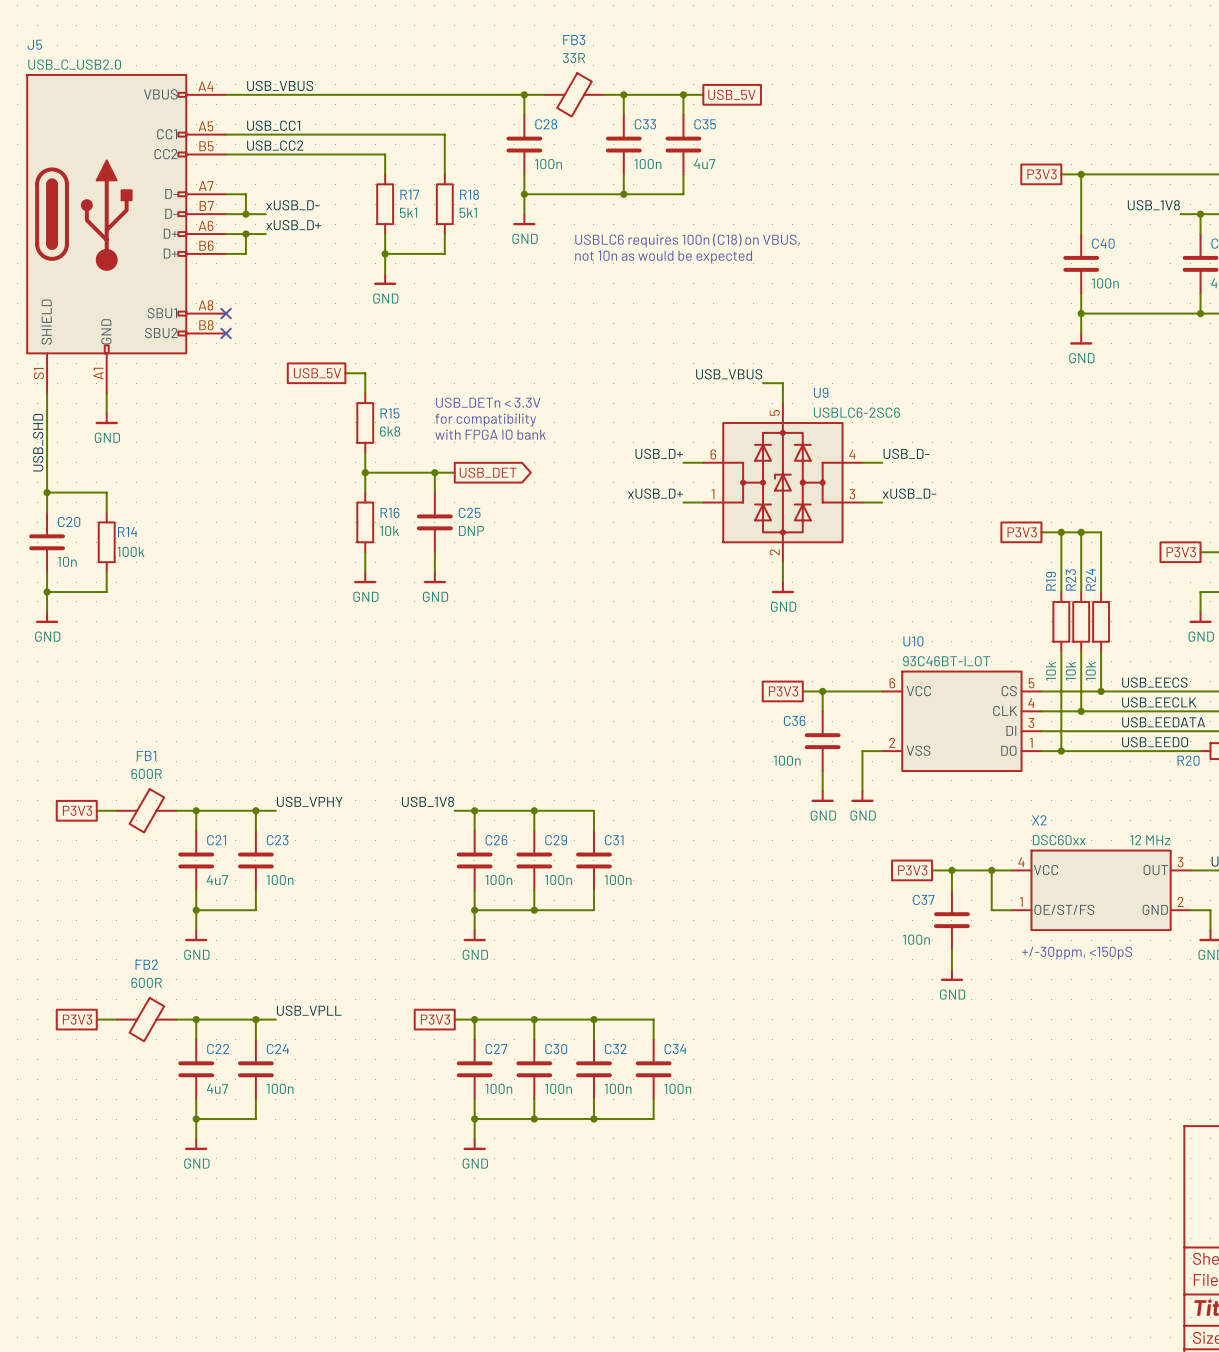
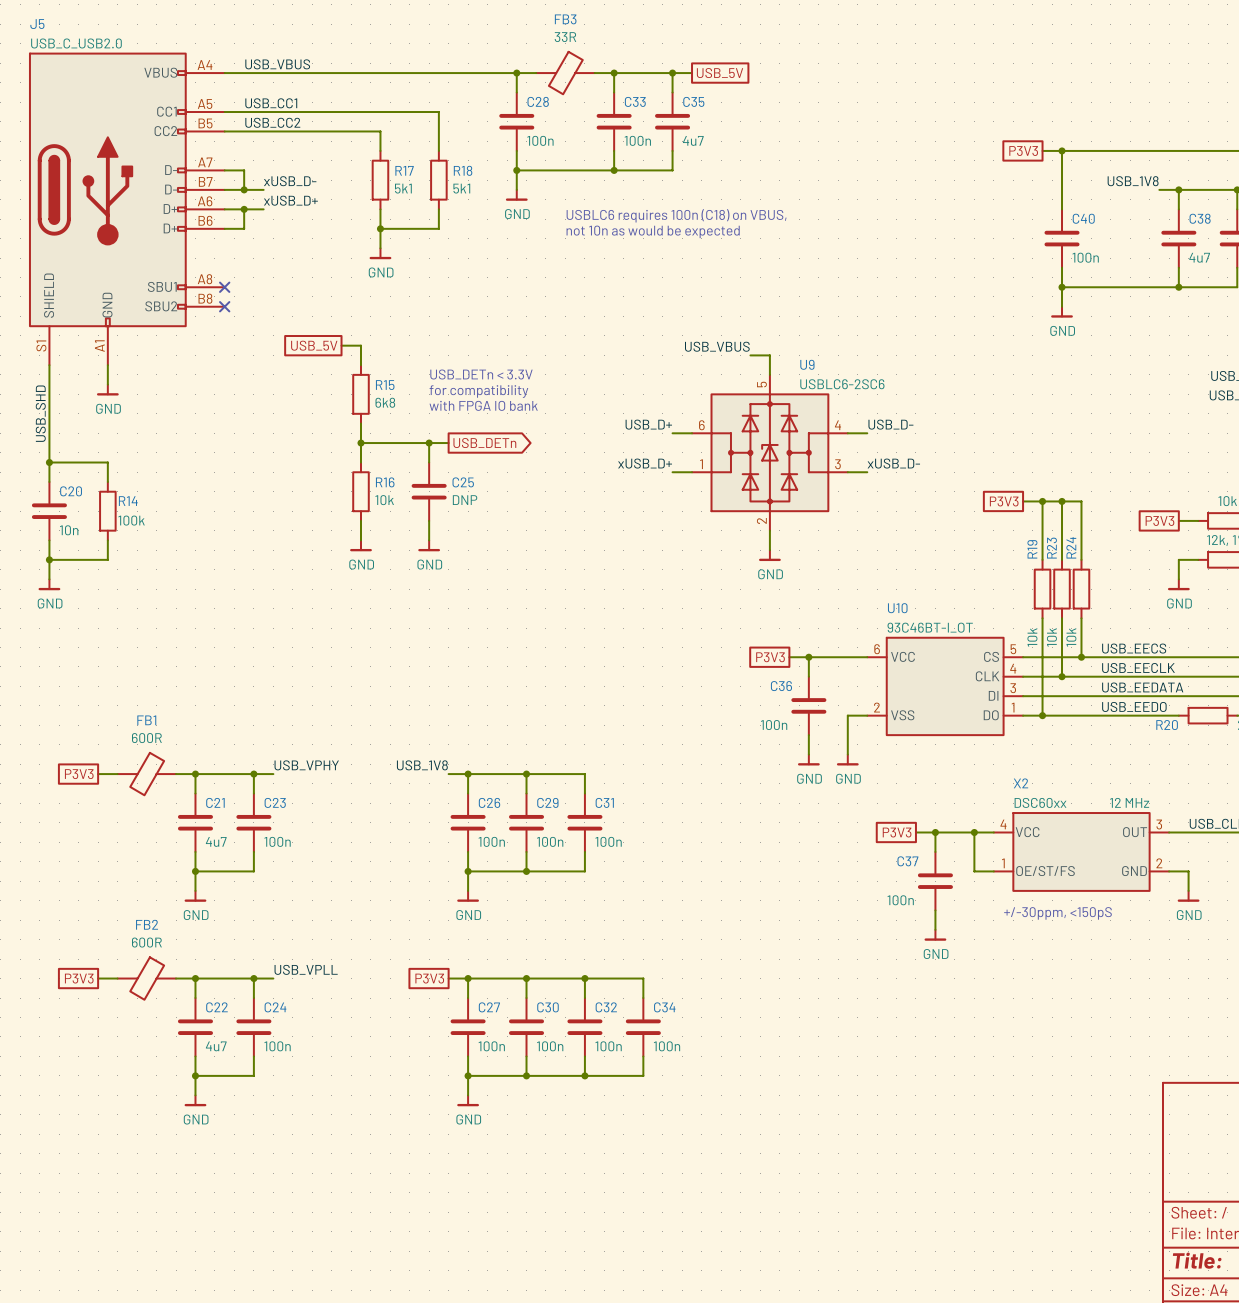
global label: USB_DET (488, 472) -> USB_DETn (484, 443)

